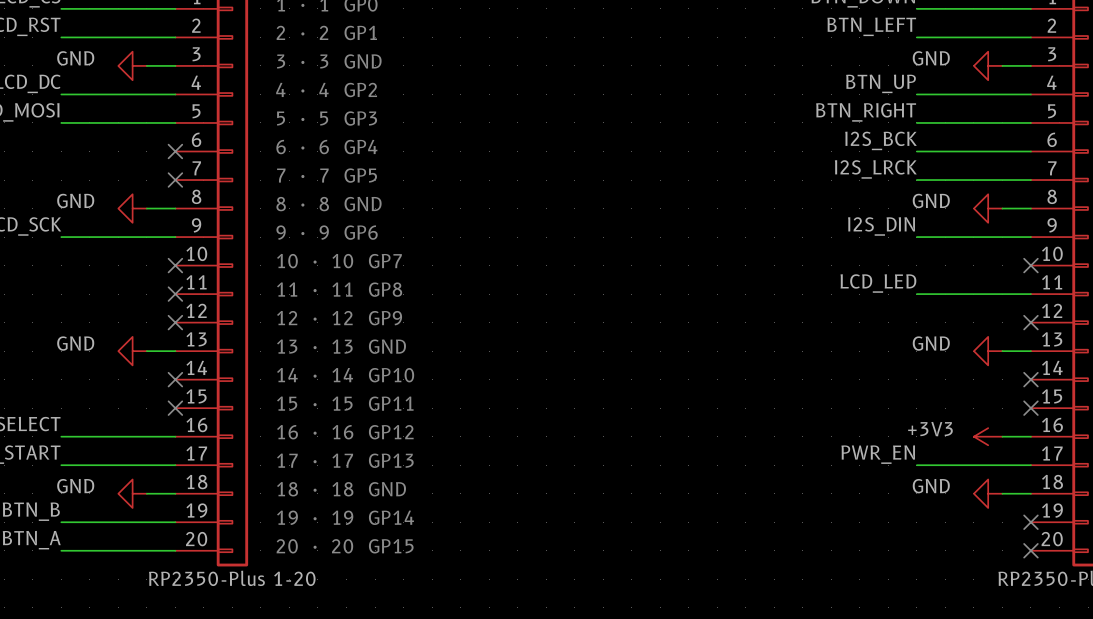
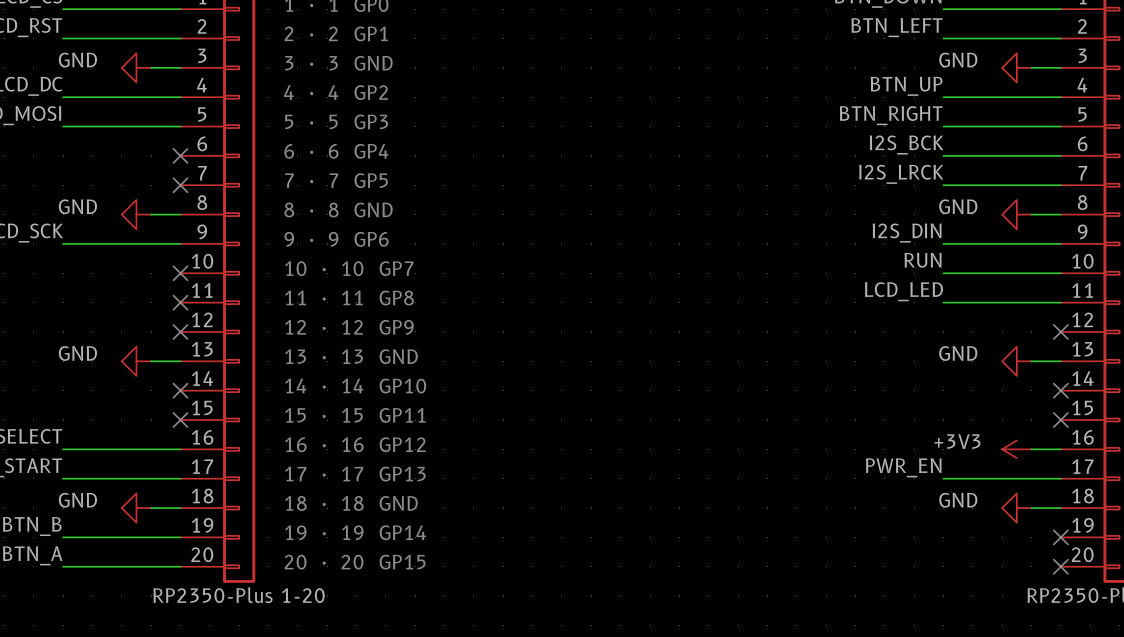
label: none -> RUN (922, 260)
wire: none -> (943, 273) (1060, 273)
no-connect mark: (1030, 265) -> none

